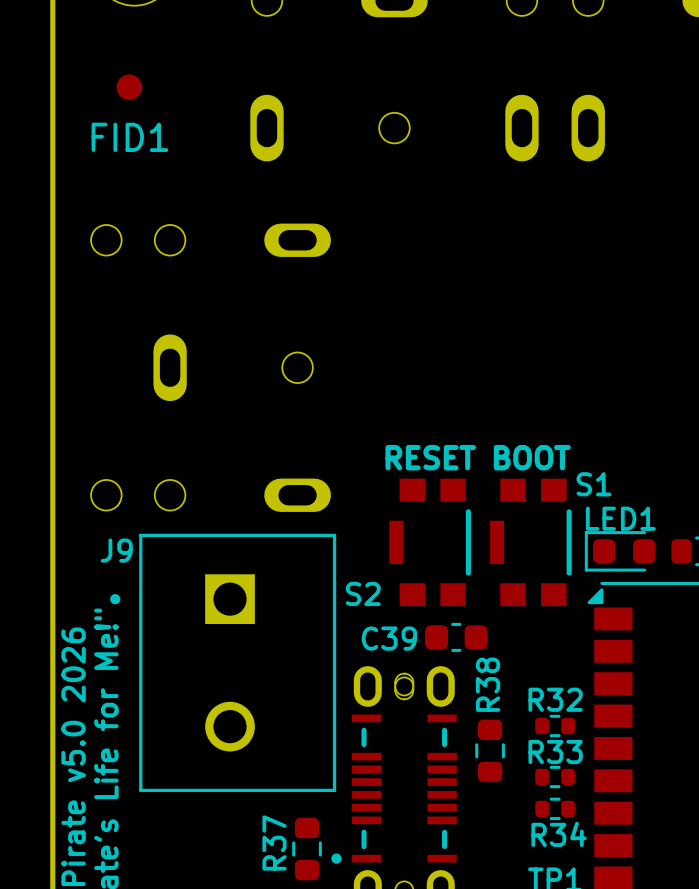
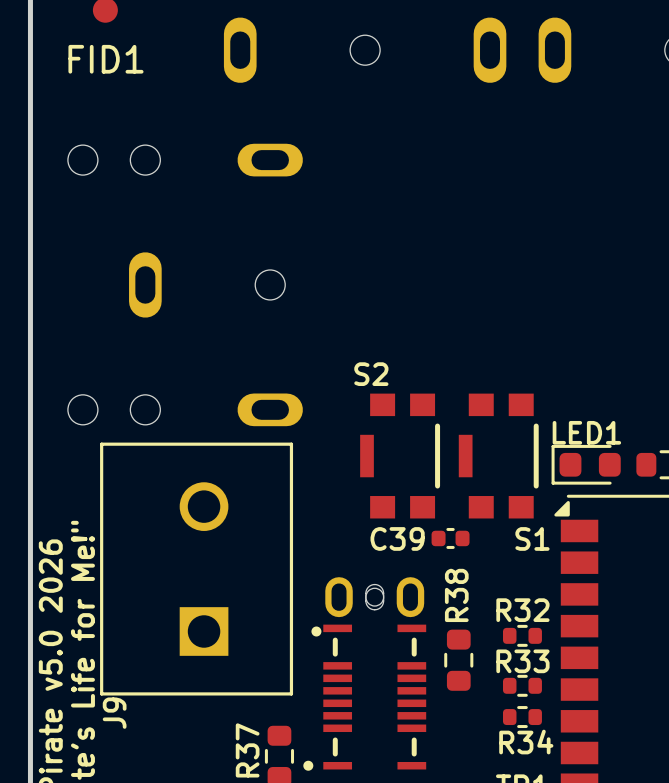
text: RESET (430, 457) -> none
text: BOOT (532, 457) -> none
S1 name position: S1 (593, 484) -> S1 (532, 538)
J9 name position: J9 (116, 550) -> J9 (114, 713)
S2 name position: S2 (363, 593) -> S2 (371, 374)
C39 footprint: [425, 622, 488, 652] -> [431, 527, 470, 549]
J9 rotation: 0° (223, 662) -> 180° (210, 569)

